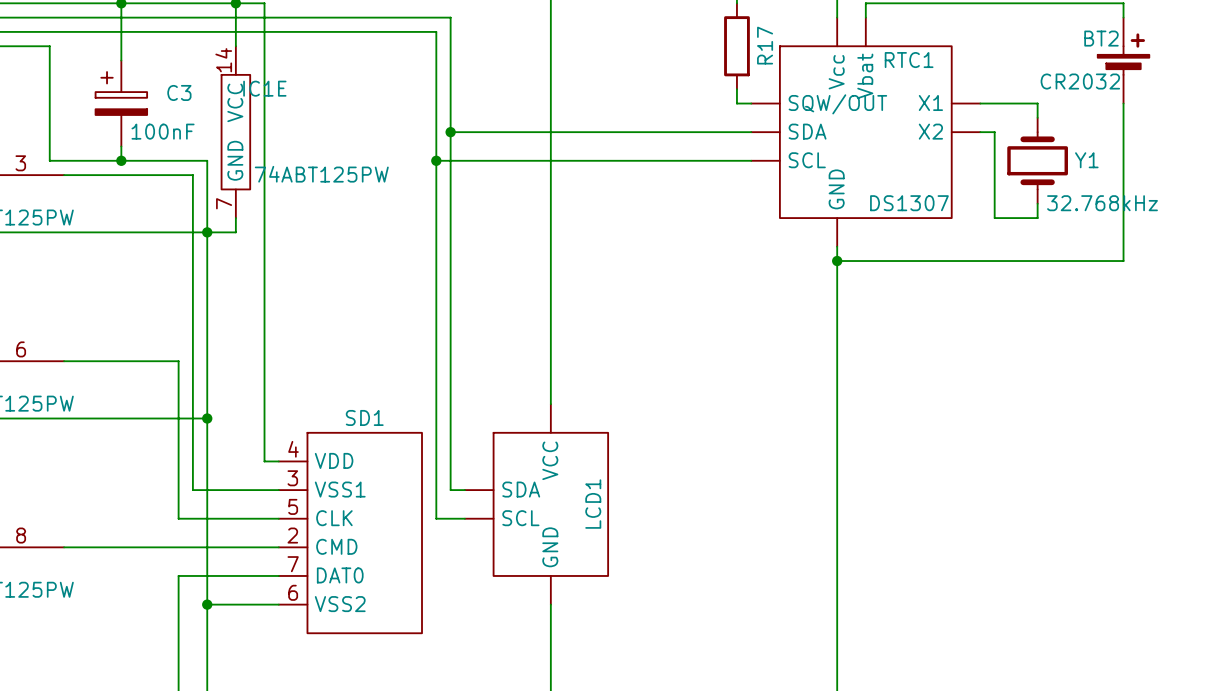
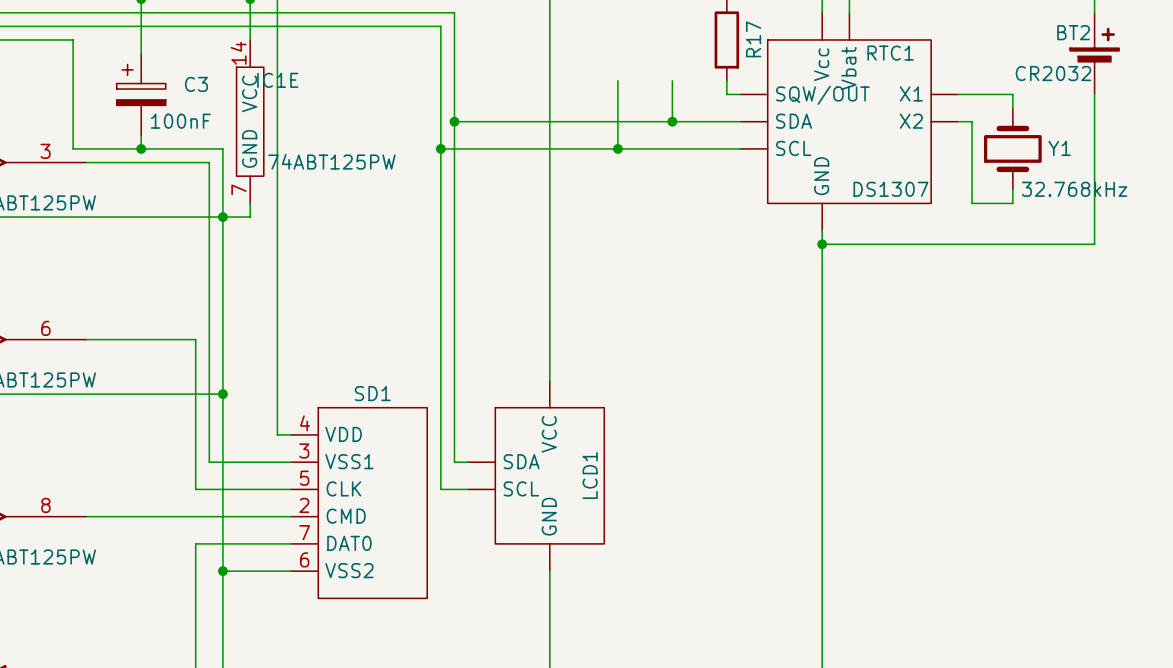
wire: none -> (617, 80) (617, 148)
wire: none -> (672, 80) (672, 121)
junction: none -> (672, 121)
junction: none -> (617, 148)

